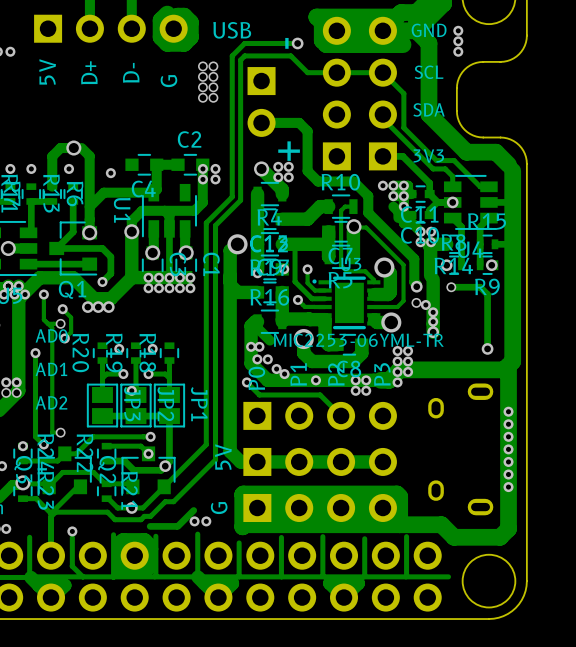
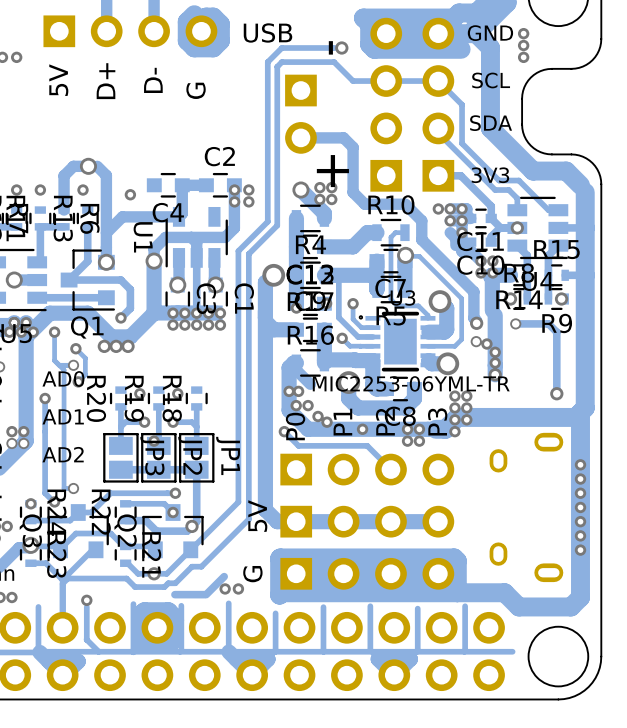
via: (202, 66) -> none
via: (213, 66) -> none
via: (202, 76) -> none
via: (213, 76) -> none
via: (202, 87) -> none
via: (213, 87) -> none
via: (202, 97) -> none
via: (213, 97) -> none

